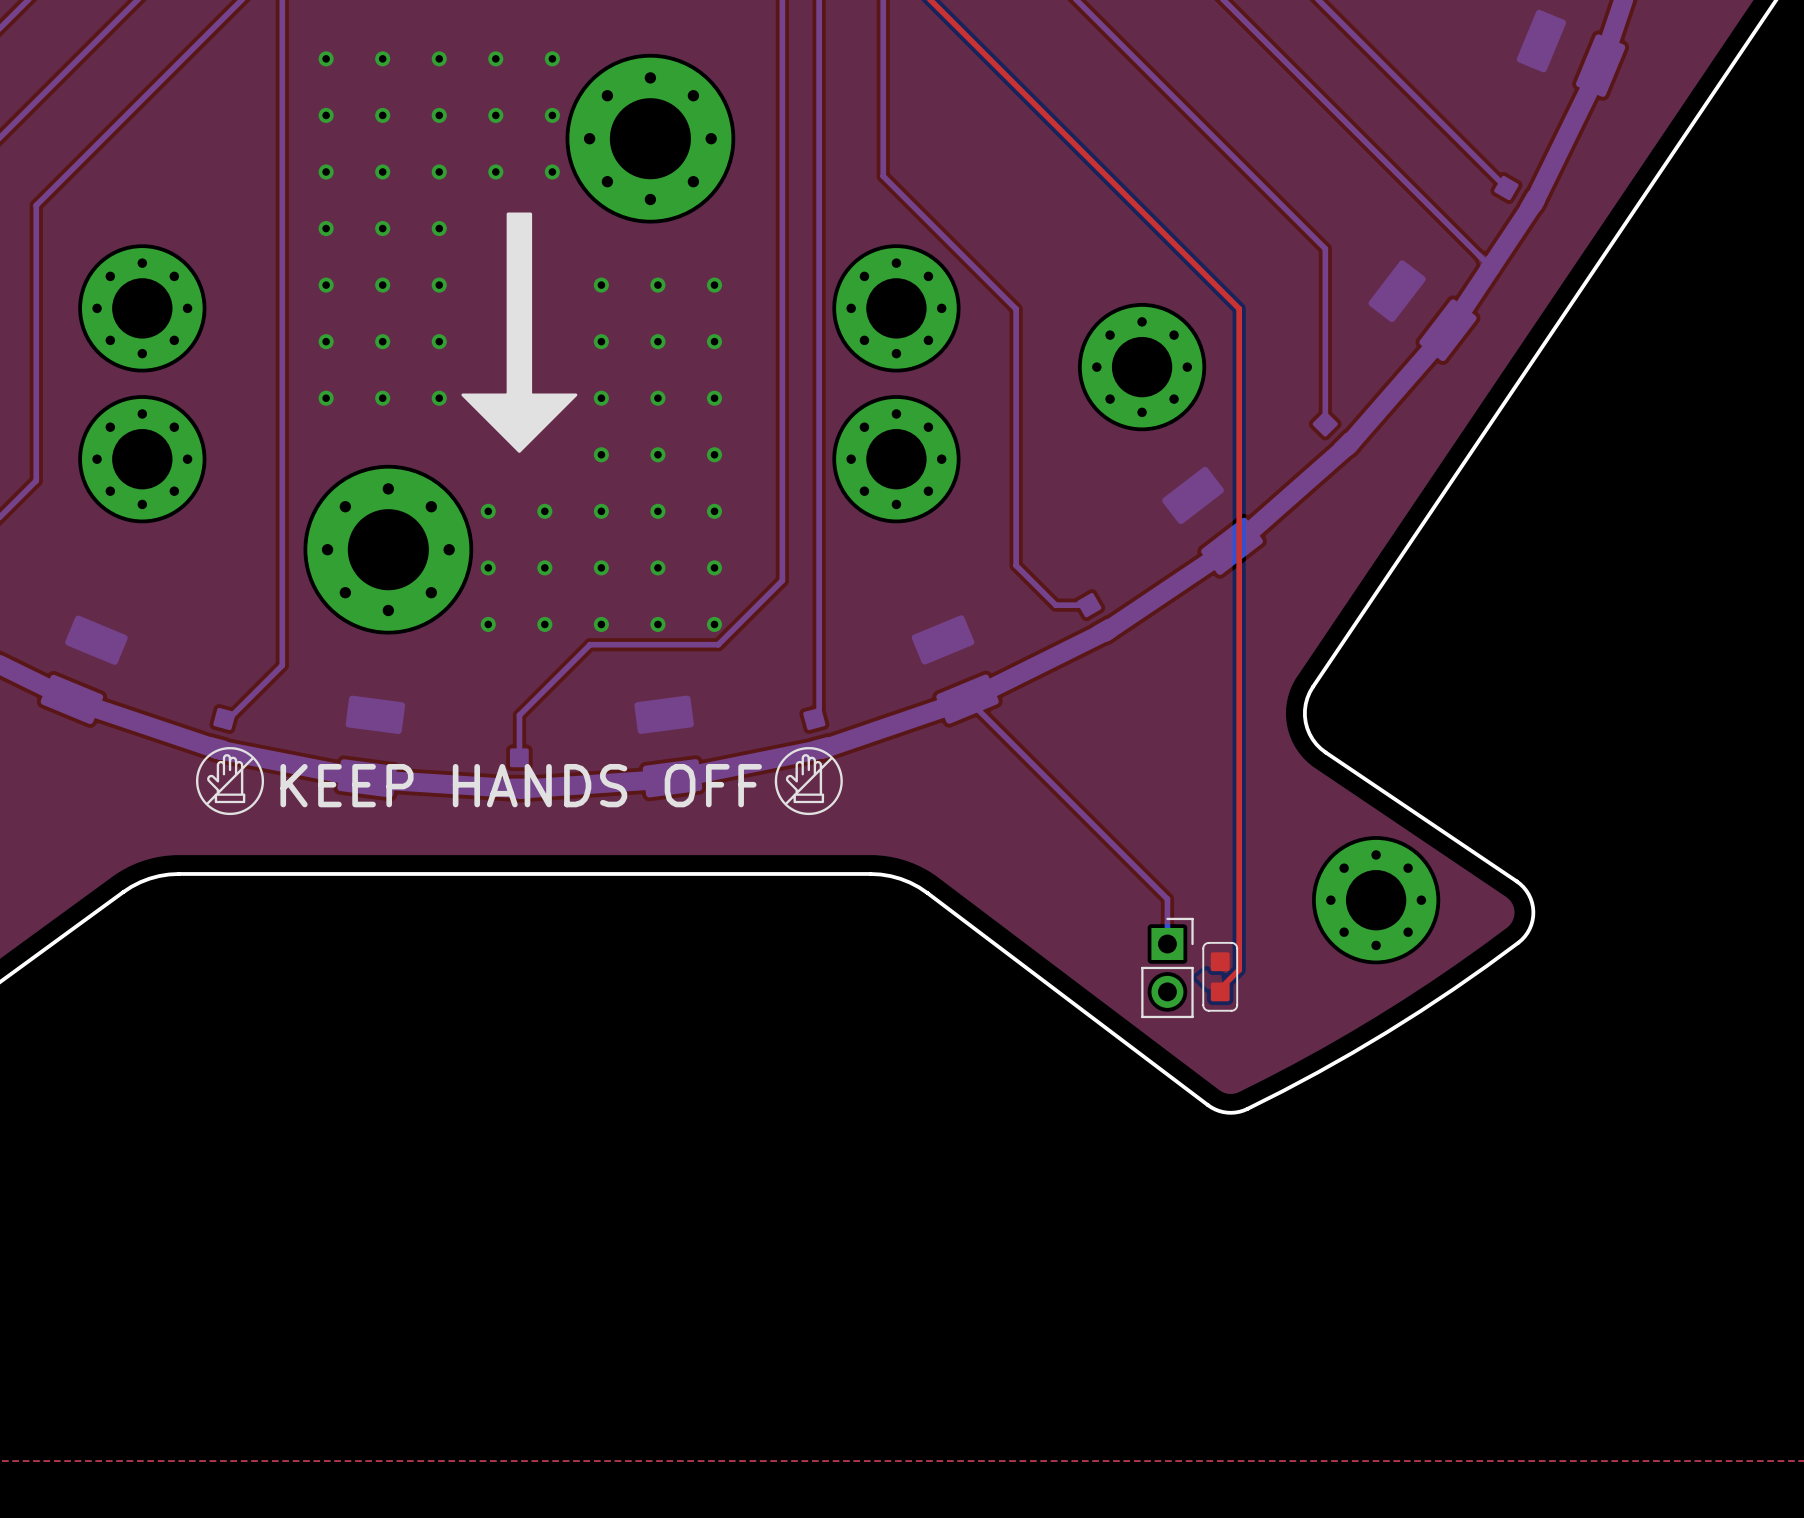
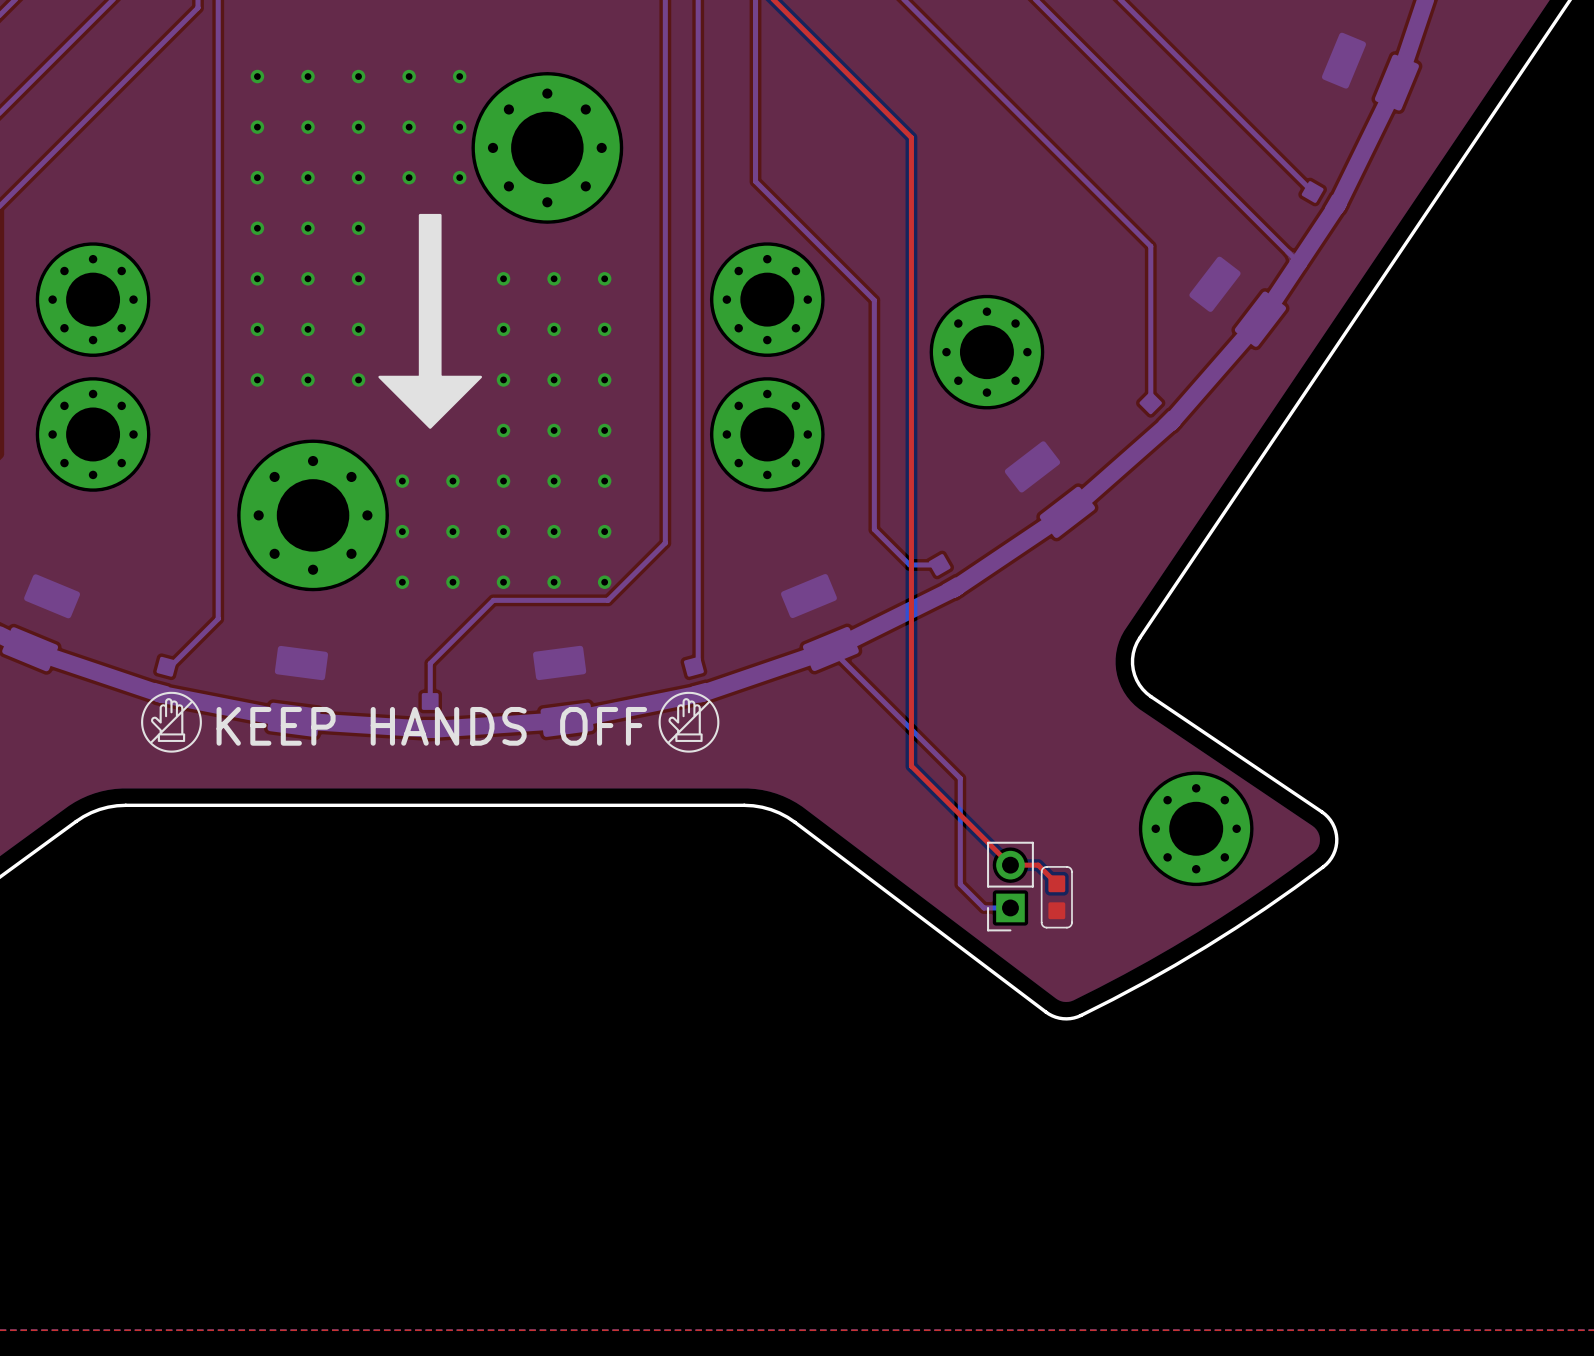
top track: (1057, 127) (1239, 308) (1239, 969) (1220, 988) -> (911, 137) (911, 766) (1010, 865) (1038, 865) (1056, 883)
bottom track: (1112, 843) (1167, 899) (1167, 944) -> (960, 778) (960, 884) (983, 907) (1010, 907)
part rotation: 0° (1167, 967) -> 180° (1010, 886)

